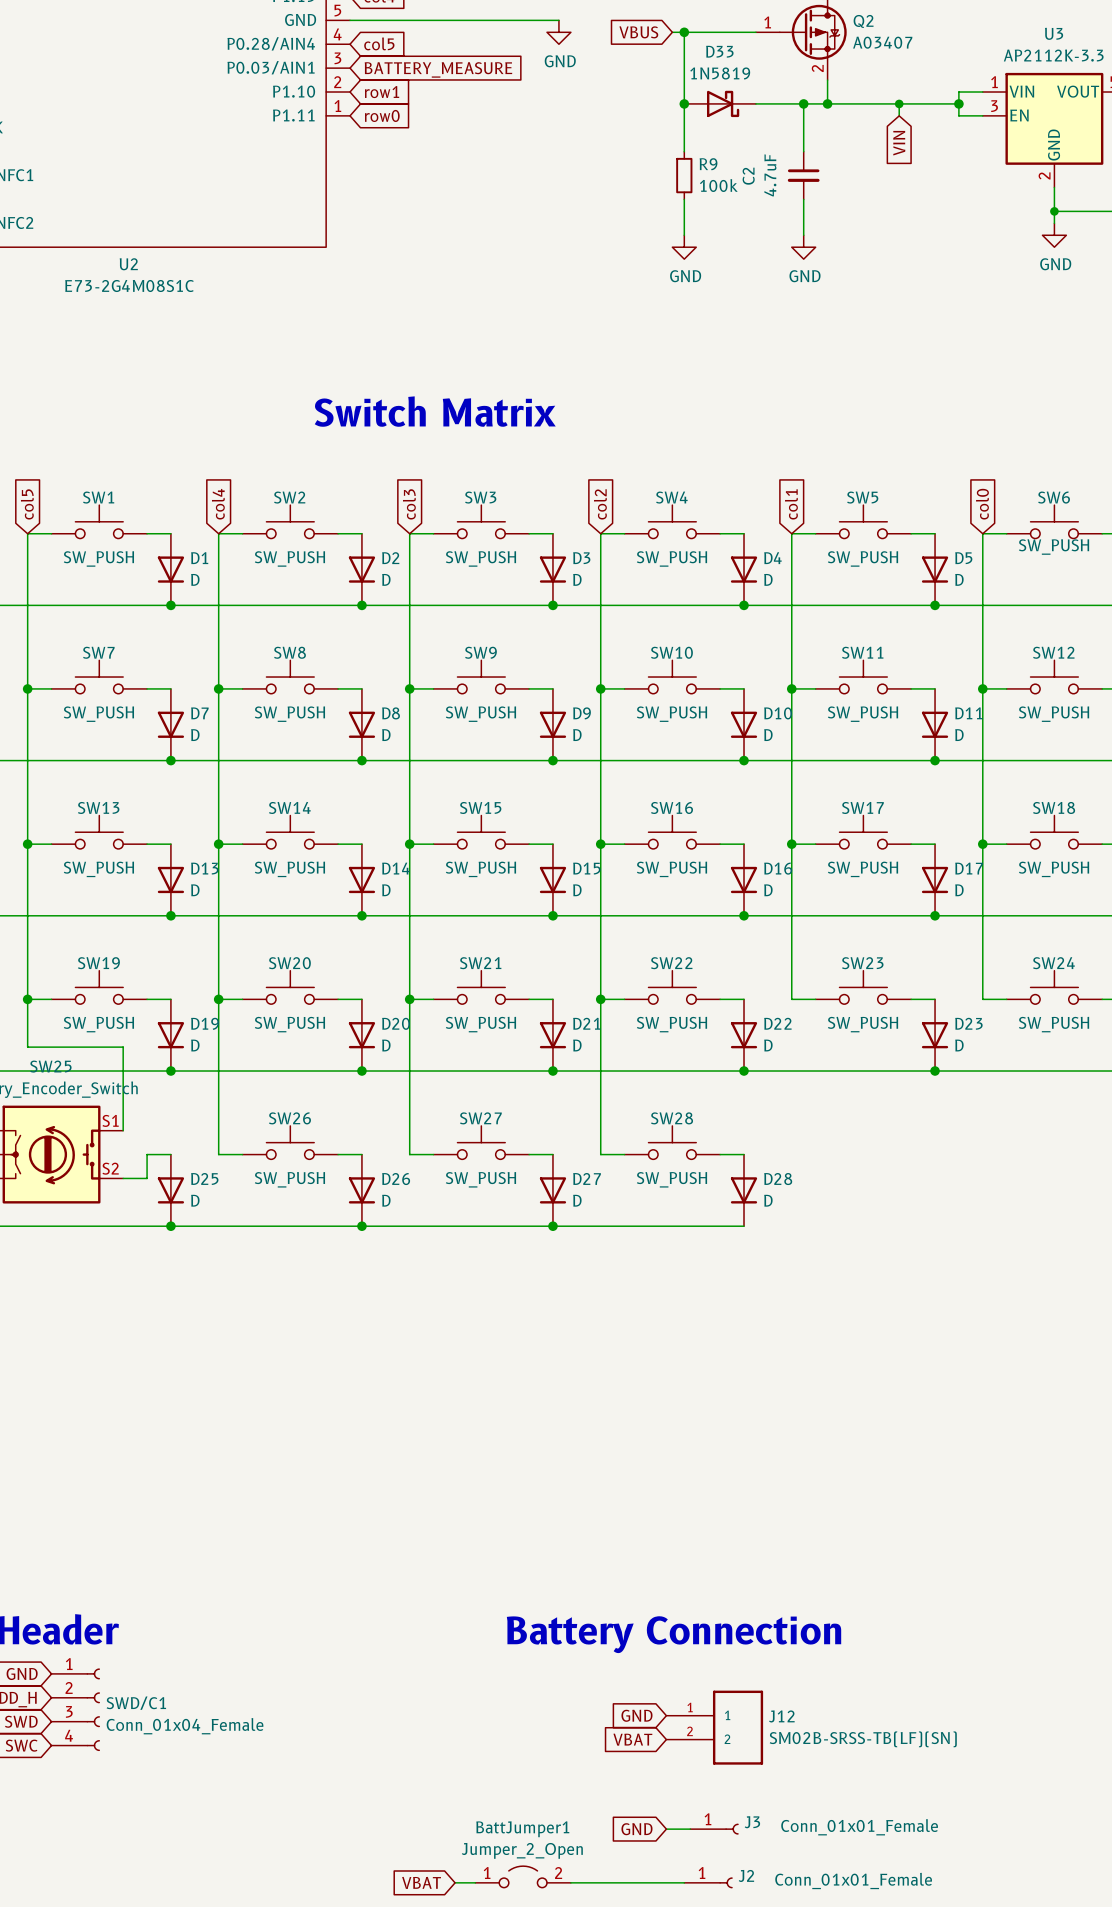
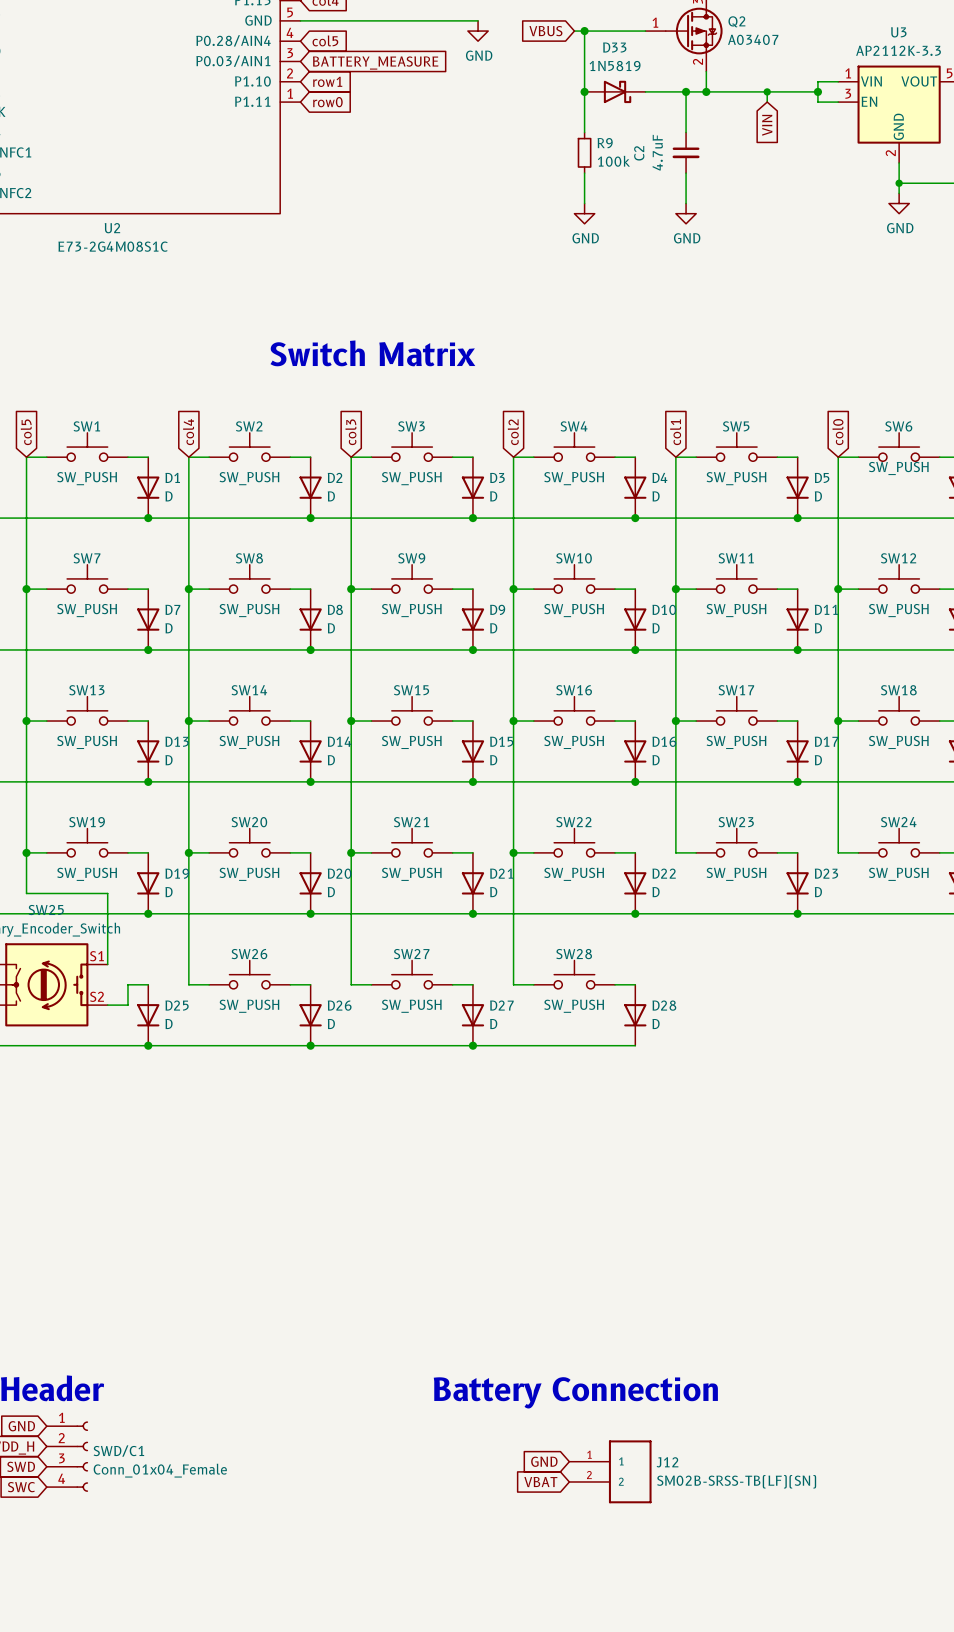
global label: GND (636, 1829) -> none
wire: (666, 1829) (690, 1829) -> none
J3: Conn_01x01_Female (714, 1829) -> none
BattJumper1: Jumper_2_Open (523, 1876) -> none
global label: VBAT (421, 1882) -> none
wire: (455, 1882) (475, 1882) -> none
wire: (570, 1882) (684, 1882) -> none
J2: Conn_01x01_Female (708, 1882) -> none

